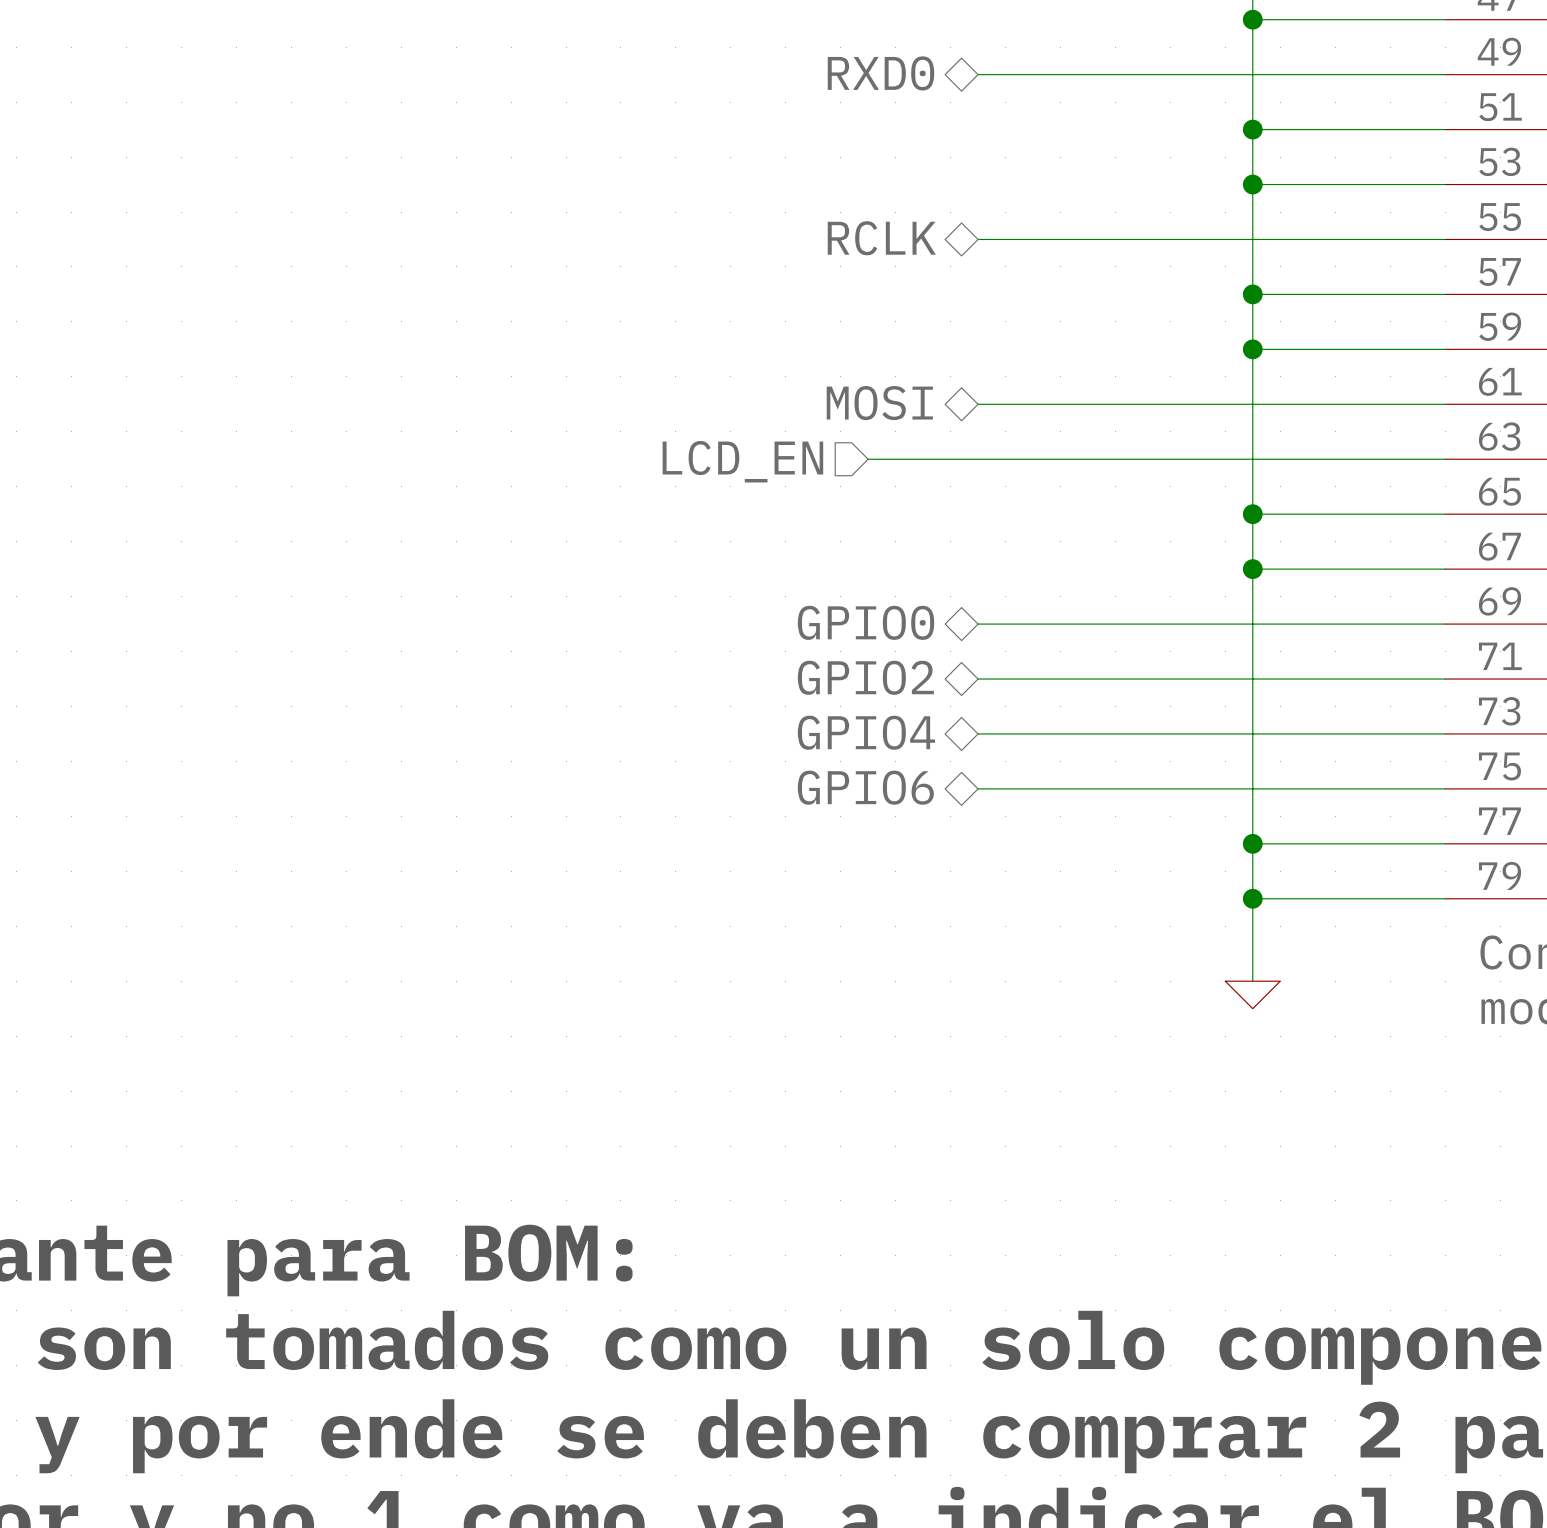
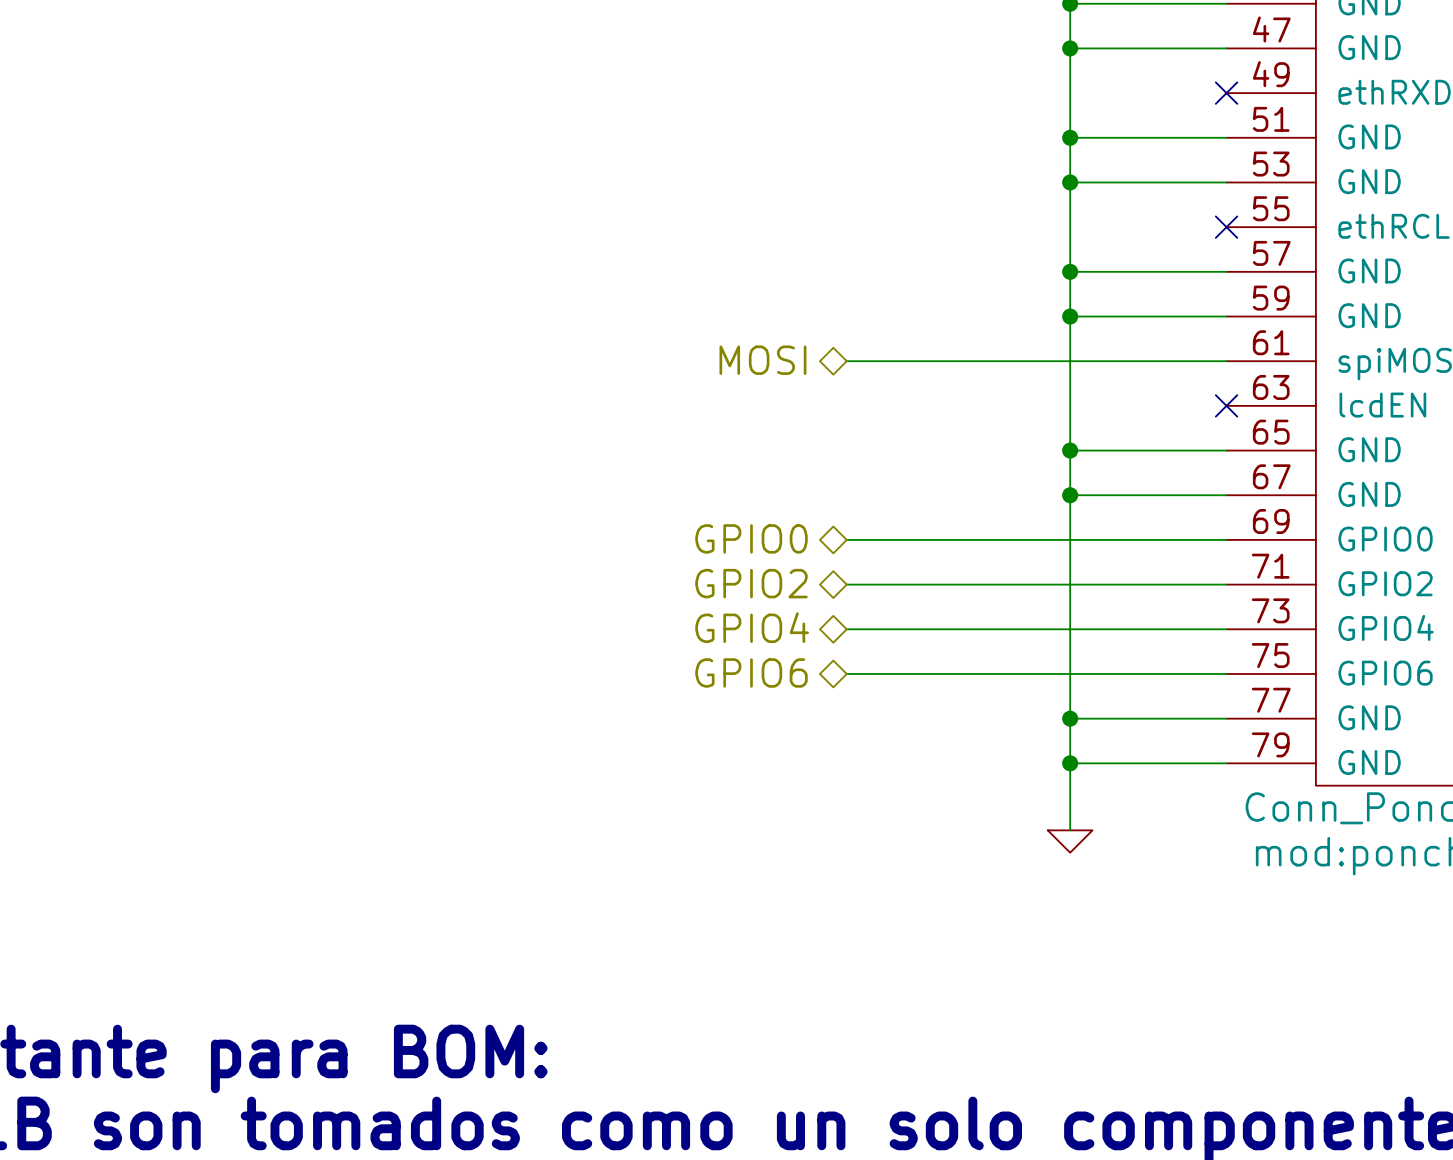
hierarchical label: RXD0 (880, 73) -> none
wire: (978, 74) (1445, 74) -> none
no-connect mark: none -> (1226, 93)
hierarchical label: RCLK (881, 238) -> none
wire: (978, 239) (1445, 239) -> none
no-connect mark: none -> (1226, 227)
wire: (868, 459) (1445, 459) -> none
no-connect mark: none -> (1226, 405)
hierarchical label: LCD_EN (742, 461) -> none

